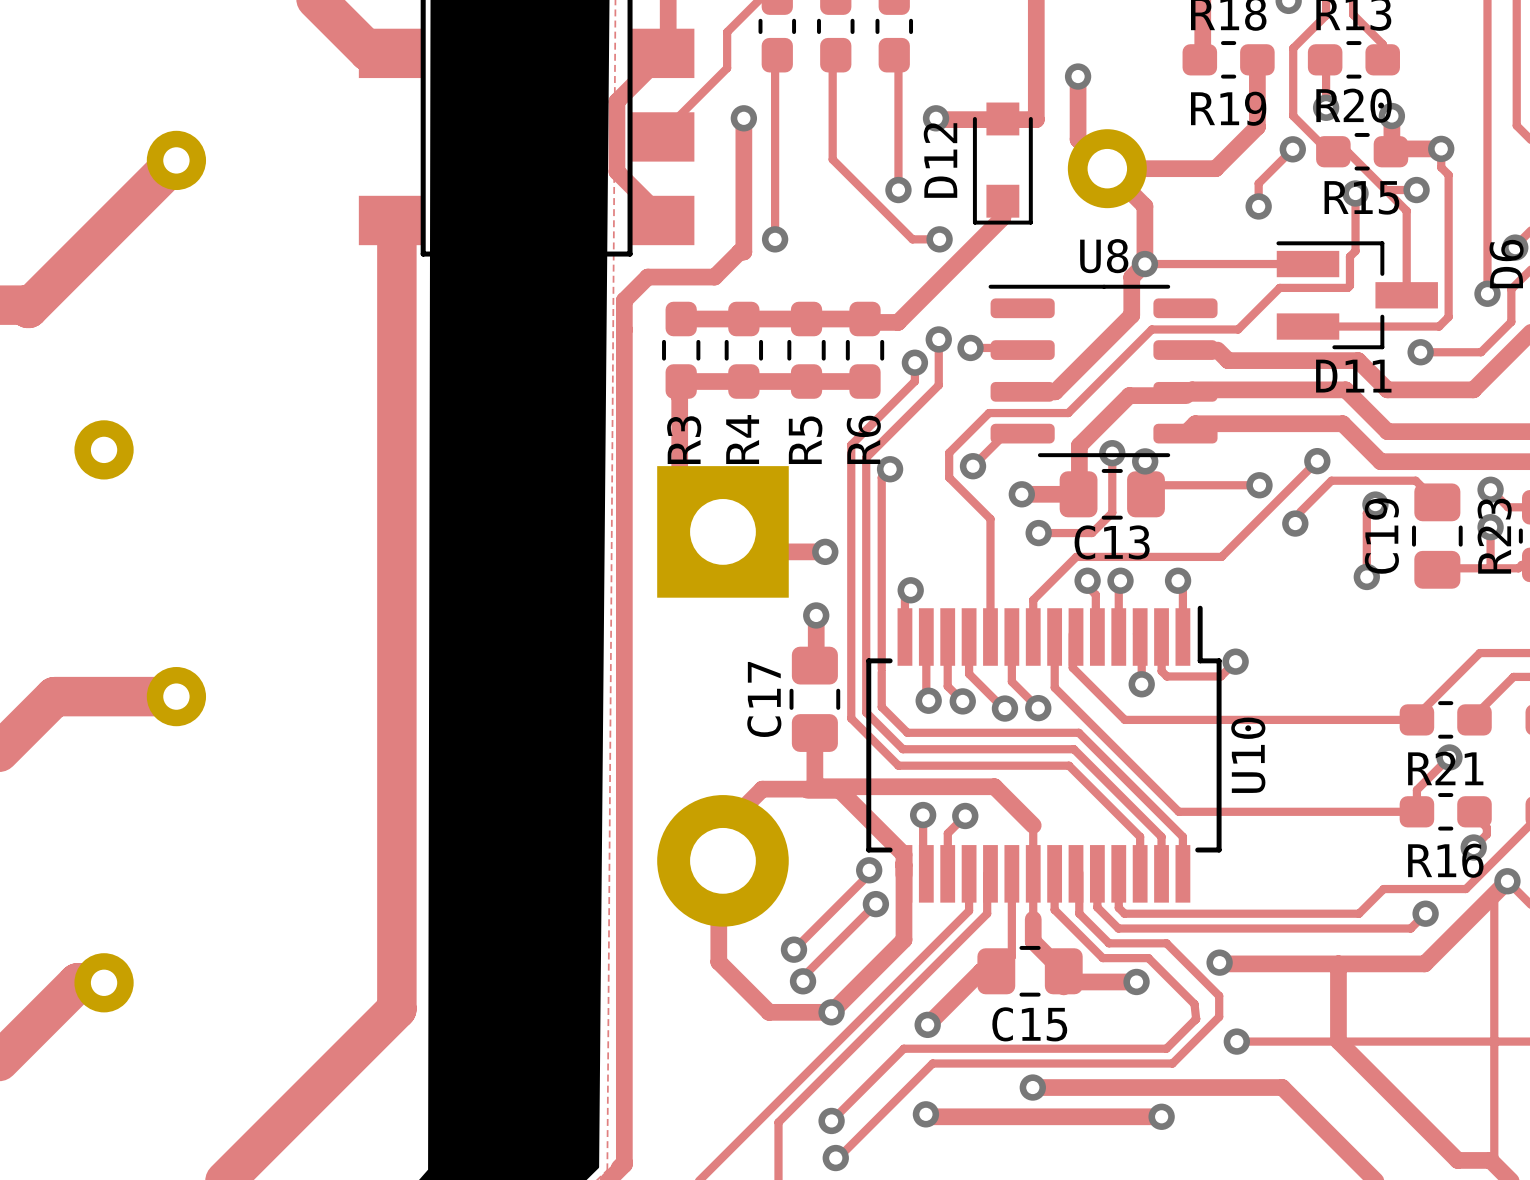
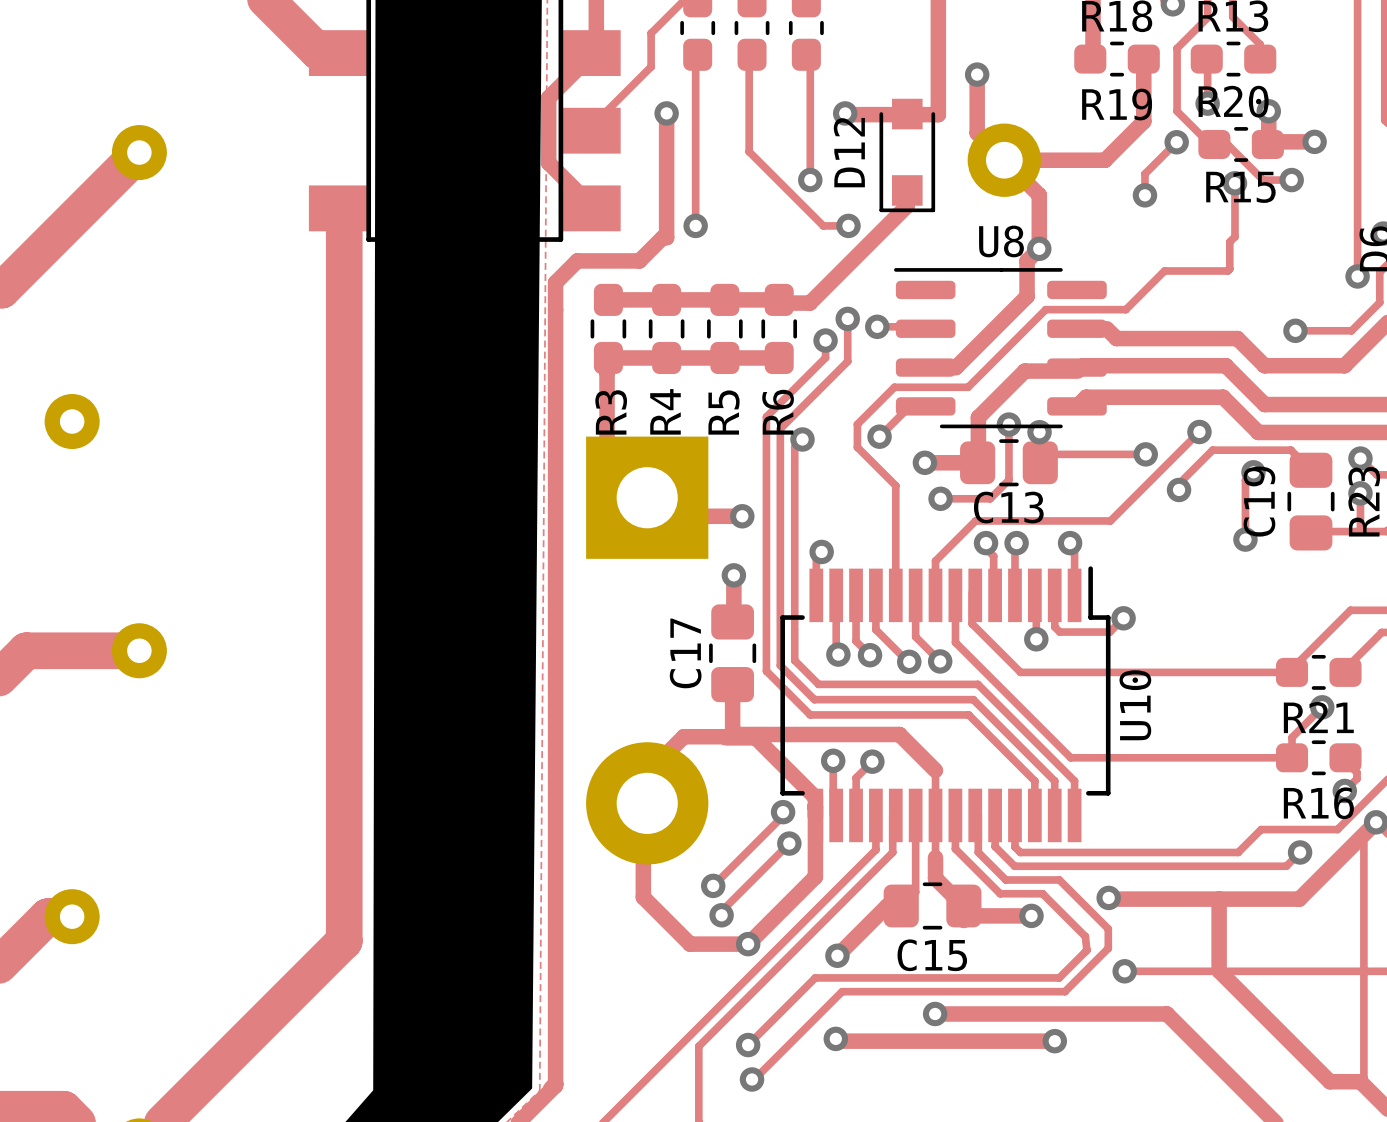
track: (1441, 148) (1441, 167) (1448, 174) (1448, 317) (1439, 326) (1308, 326) -> none
track: (1385, 190) (1406, 210) (1406, 295) -> none
track: (1136, 264) (1308, 264) -> none
D11: (1357, 295) -> none

